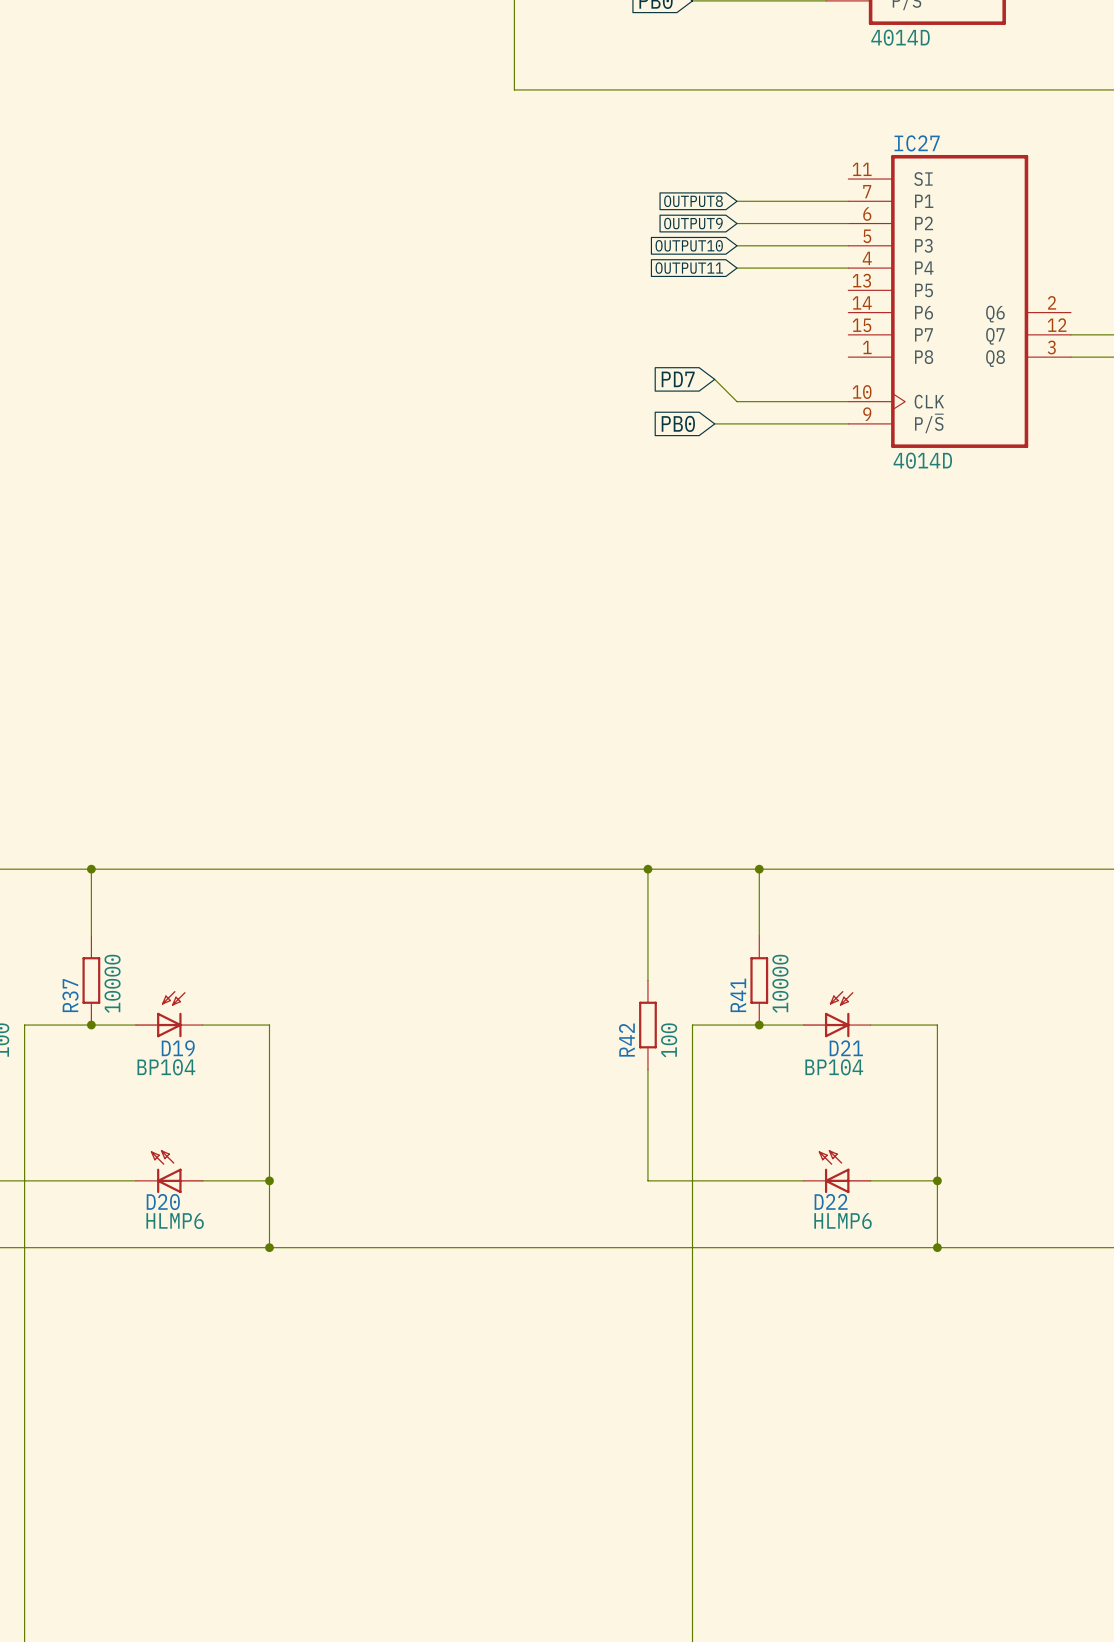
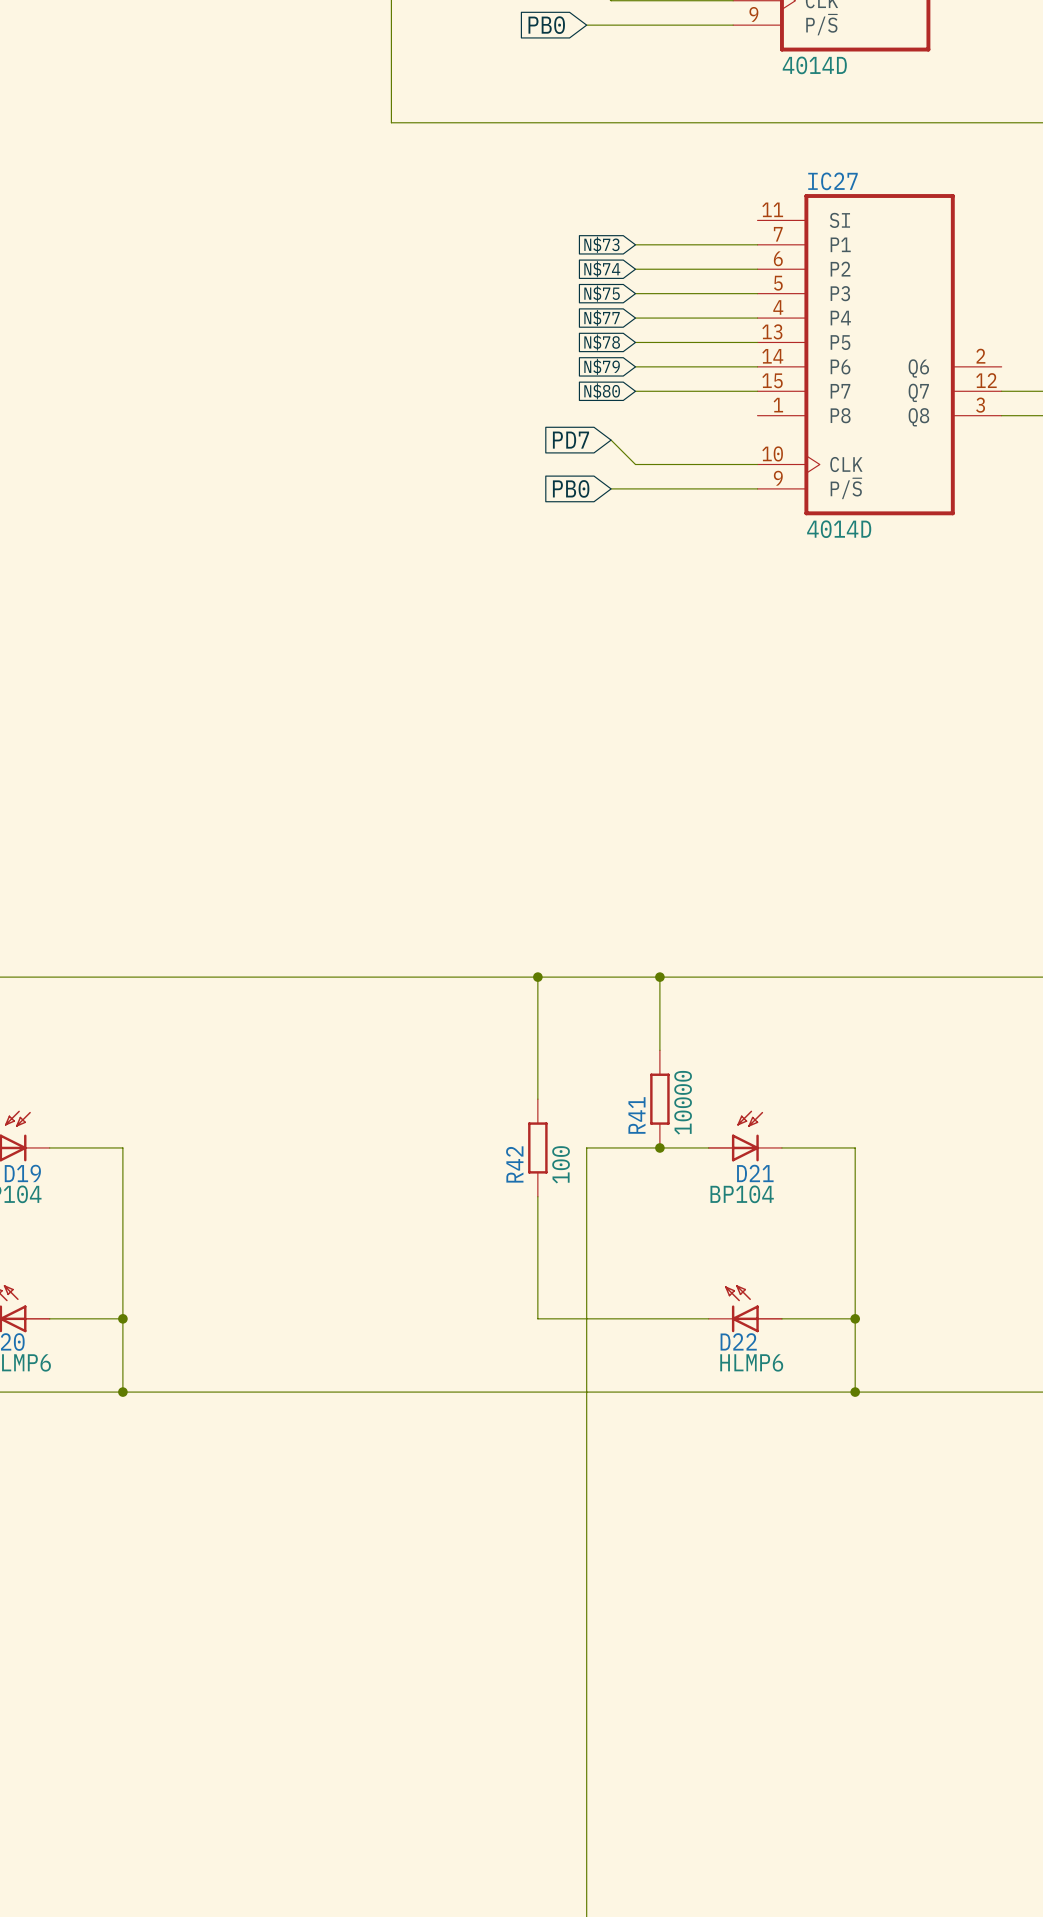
global label: OUTPUT8 (693, 201) -> N$73 (601, 244)
global label: OUTPUT9 (693, 223) -> N$74 (602, 269)
global label: OUTPUT10 (689, 245) -> N$75 (602, 293)
global label: OUTPUT11 (689, 268) -> N$77 (602, 318)
global label: none -> N$78 (602, 342)
wire: none -> (635, 342) (757, 342)
global label: none -> N$79 (602, 366)
wire: none -> (635, 366) (757, 366)
global label: none -> N$80 (602, 391)
wire: none -> (635, 391) (757, 391)

